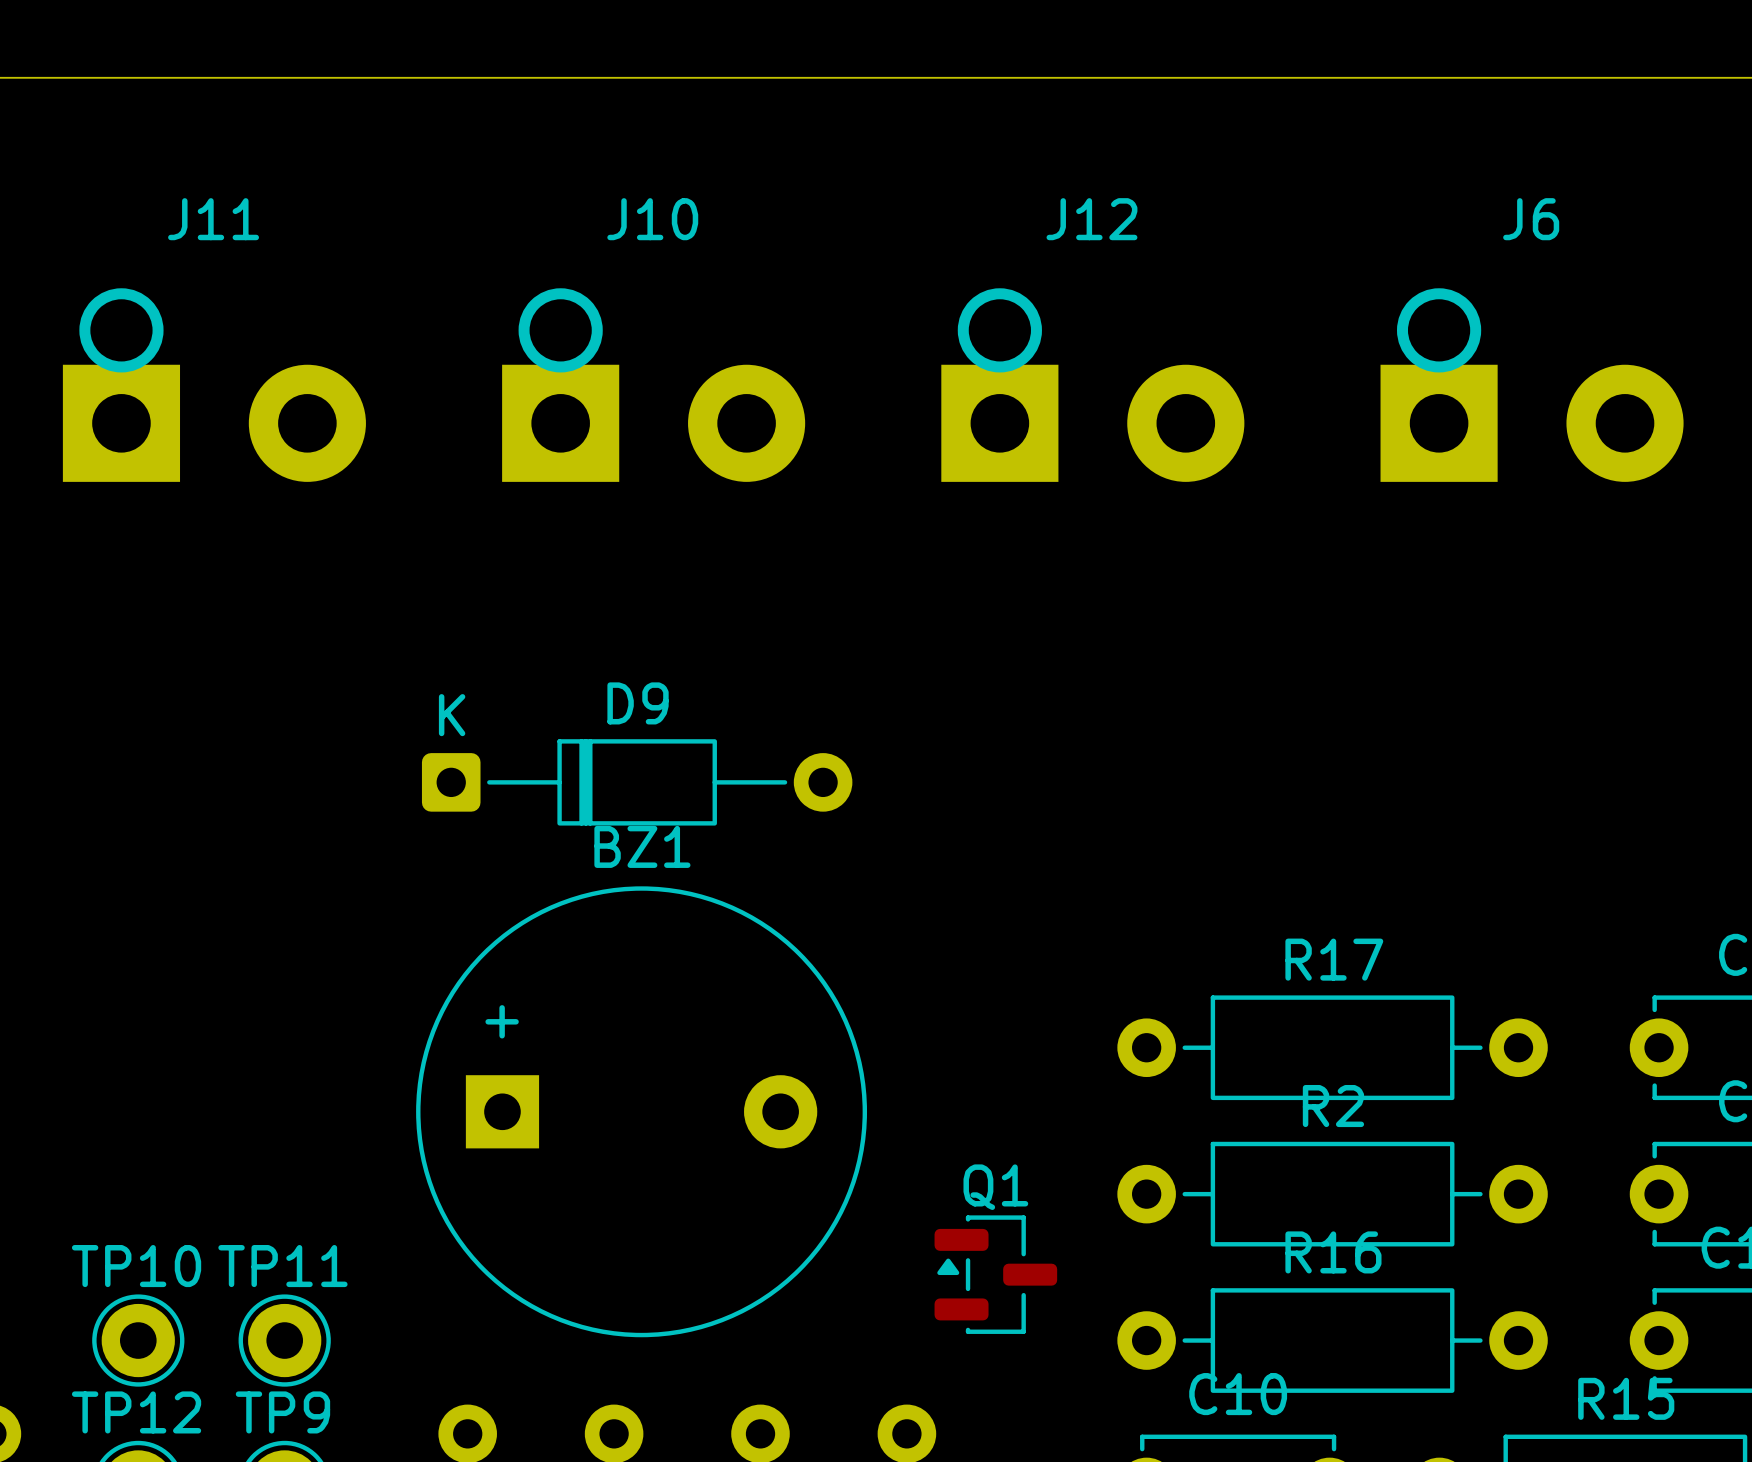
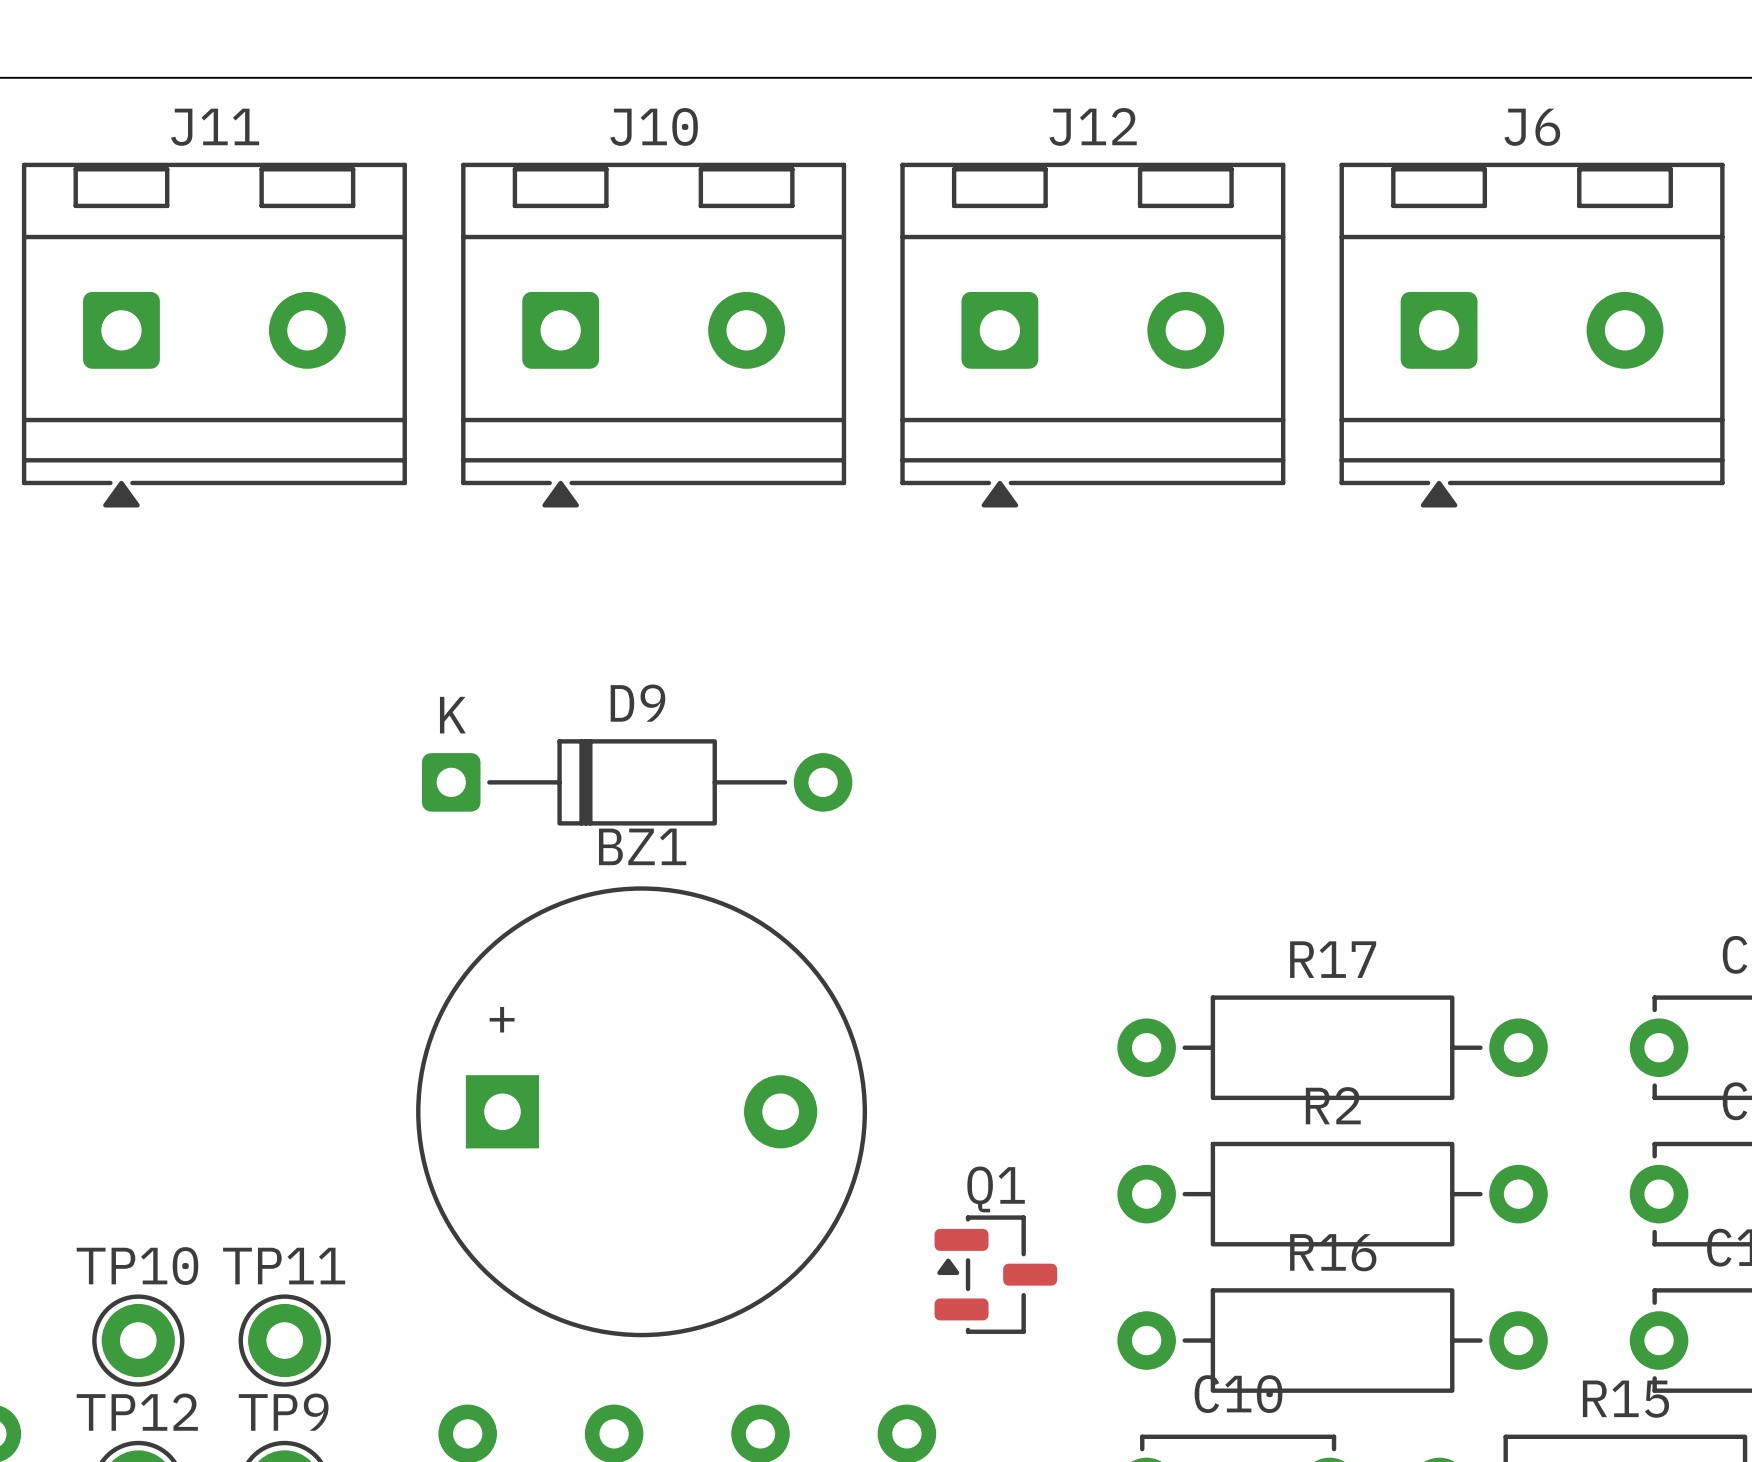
J11 footprint: [62, 288, 366, 482] -> [21, 162, 407, 508]
J10 footprint: [502, 288, 806, 482] -> [461, 162, 847, 508]
J12 footprint: [941, 288, 1245, 482] -> [900, 162, 1286, 508]
J6 footprint: [1380, 288, 1684, 482] -> [1339, 162, 1725, 508]

